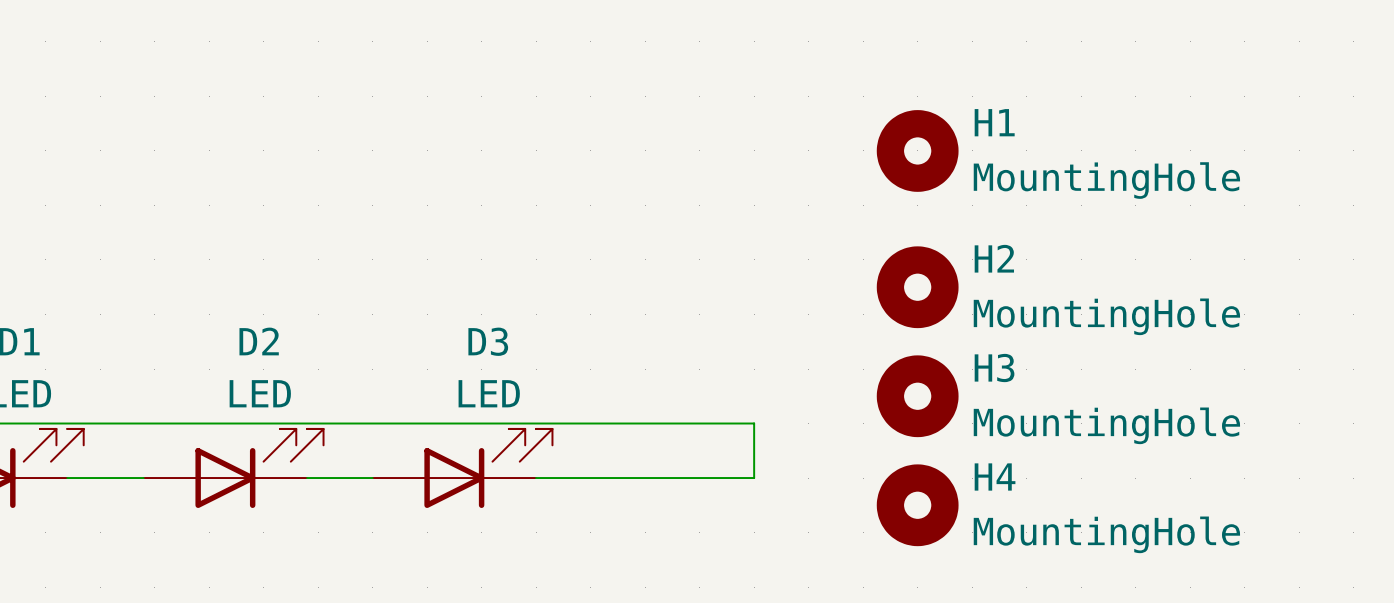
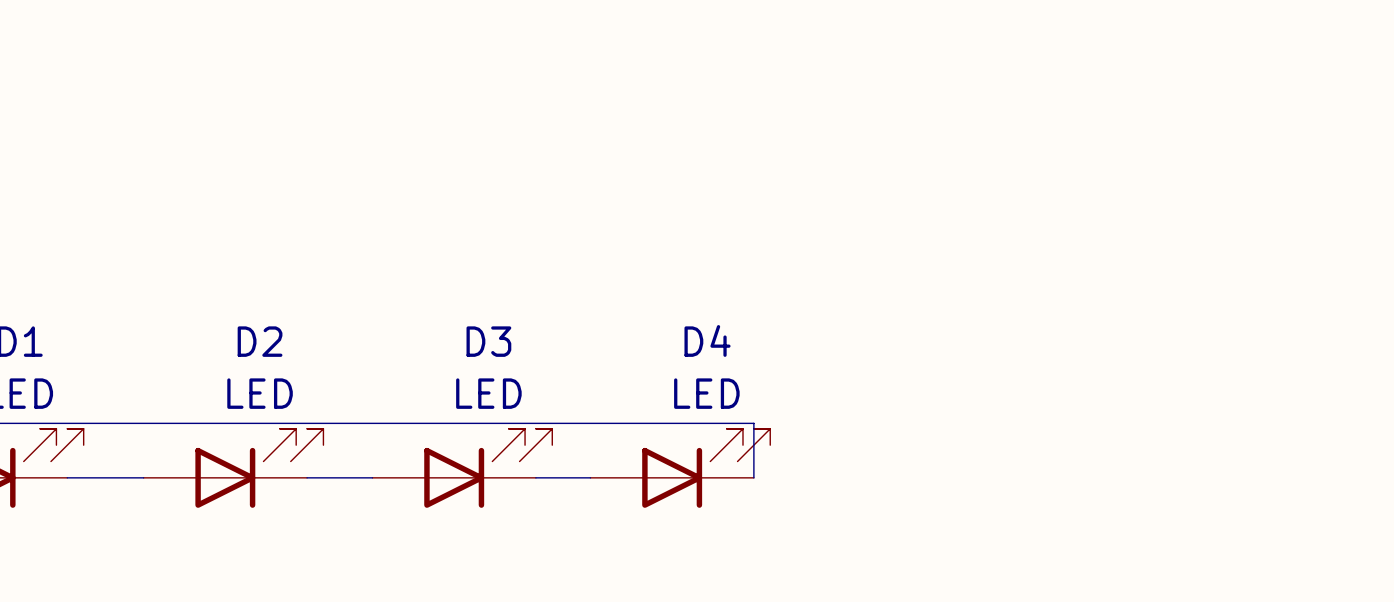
H1: MountingHole (917, 150) -> none
H2: MountingHole (917, 287) -> none
H3: MountingHole (917, 396) -> none
D4: none -> LED (680, 468)
H4: MountingHole (917, 505) -> none

